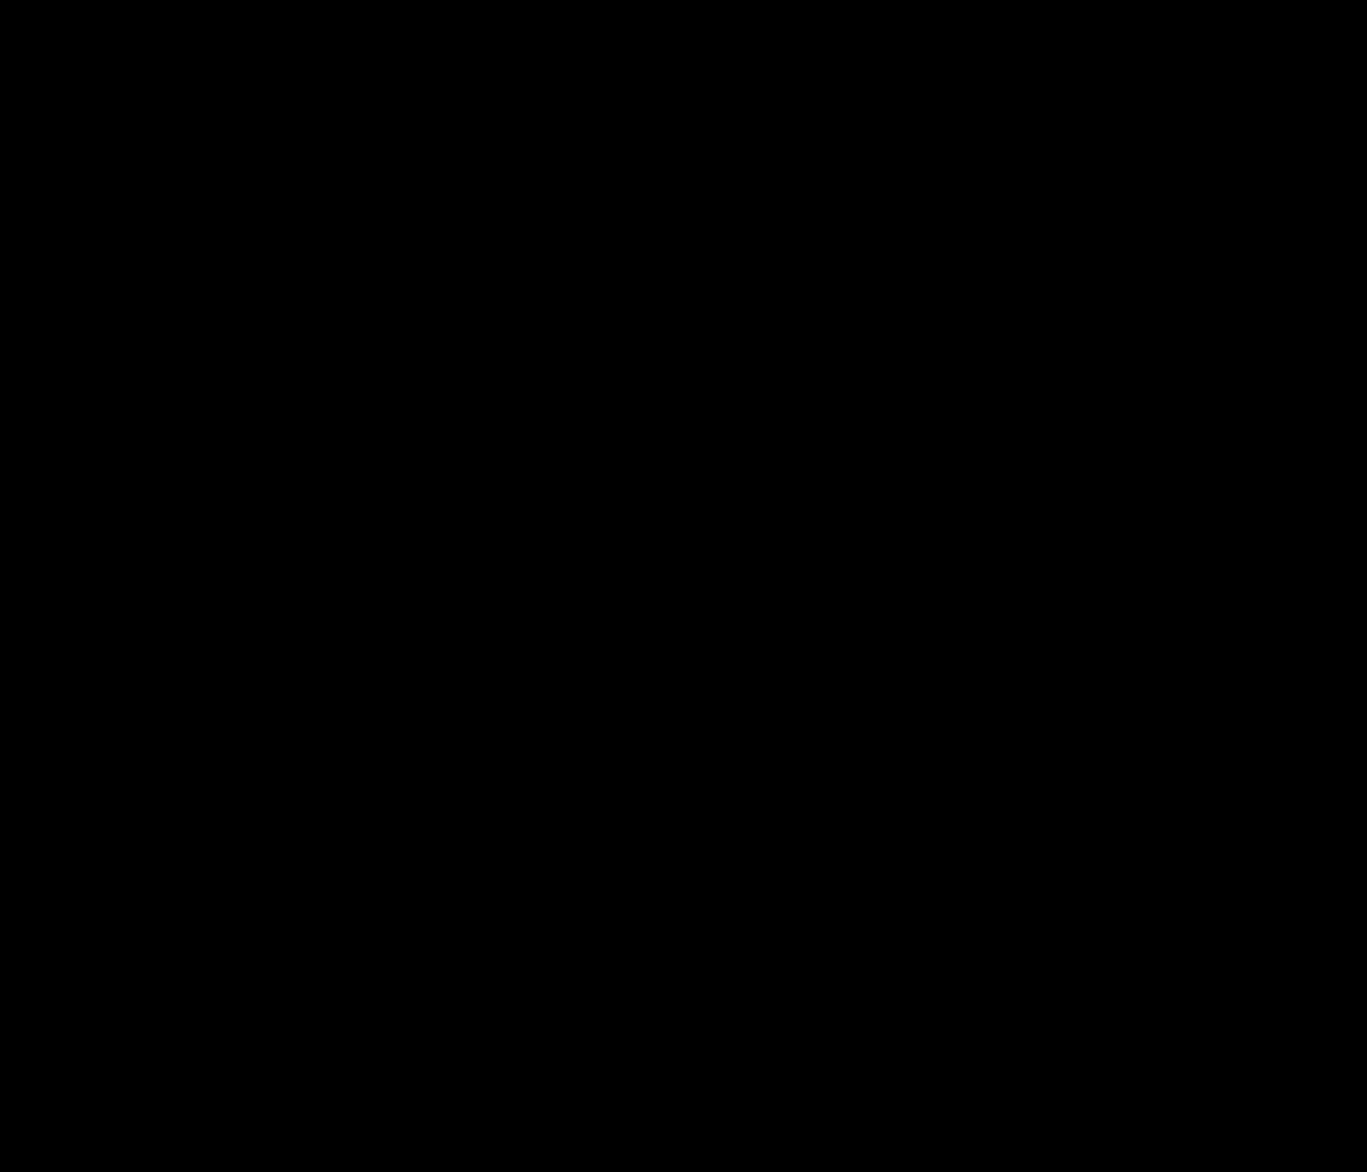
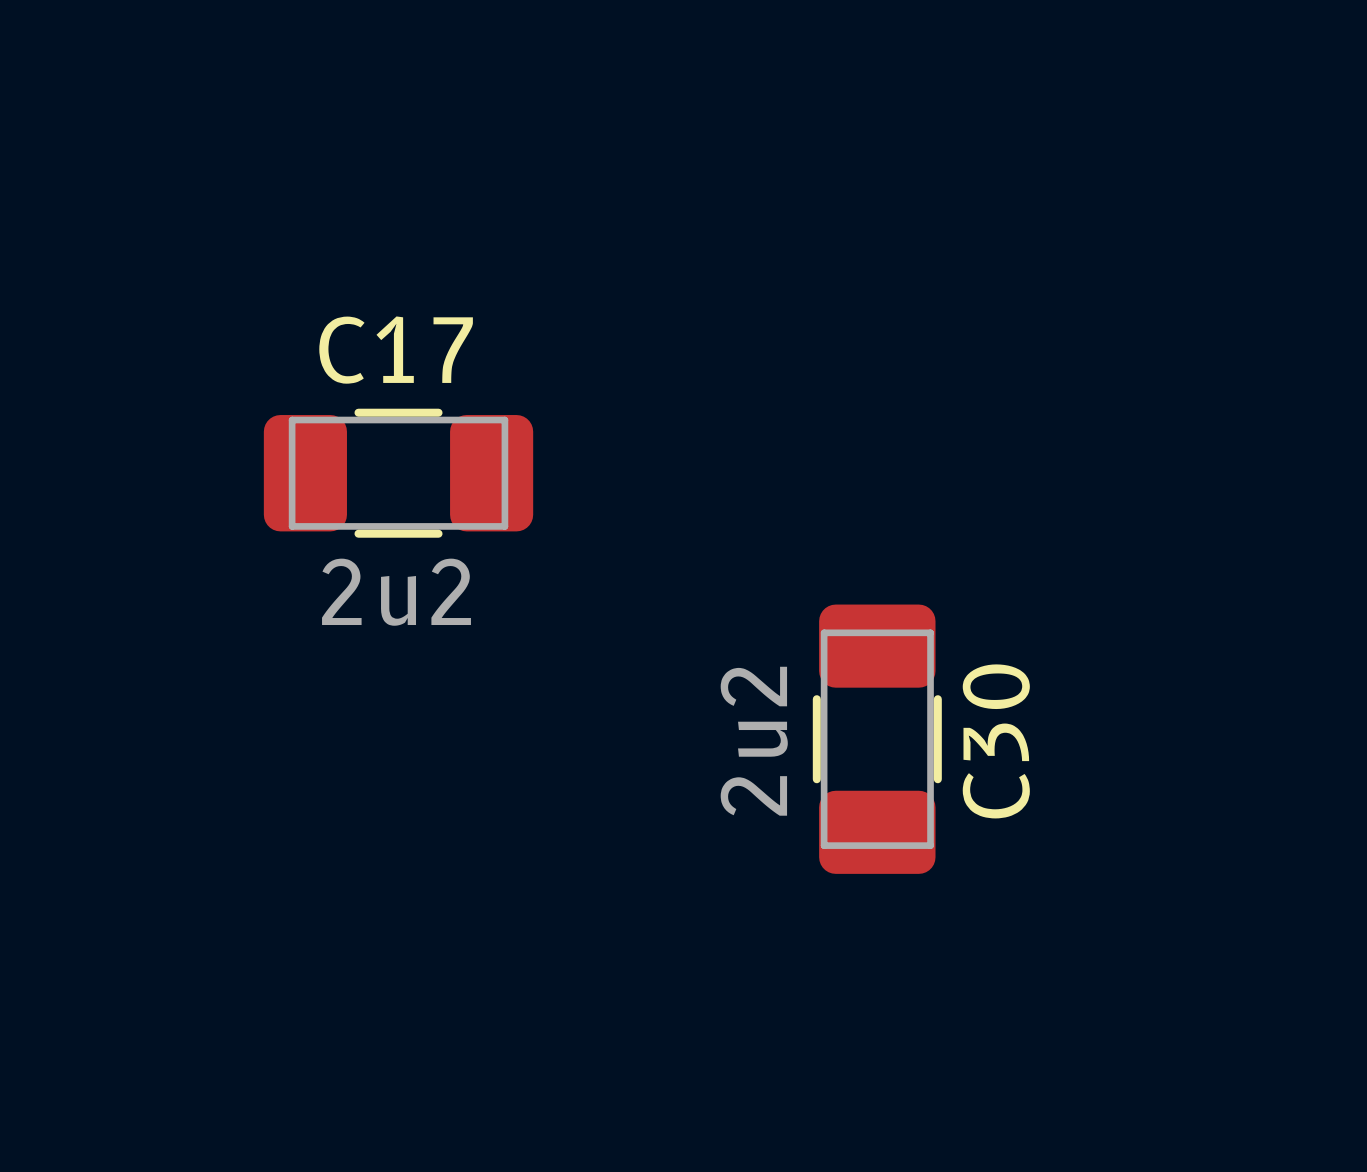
C17: none -> 2u2 (398, 473)
C30: none -> 2u2 (877, 739)

